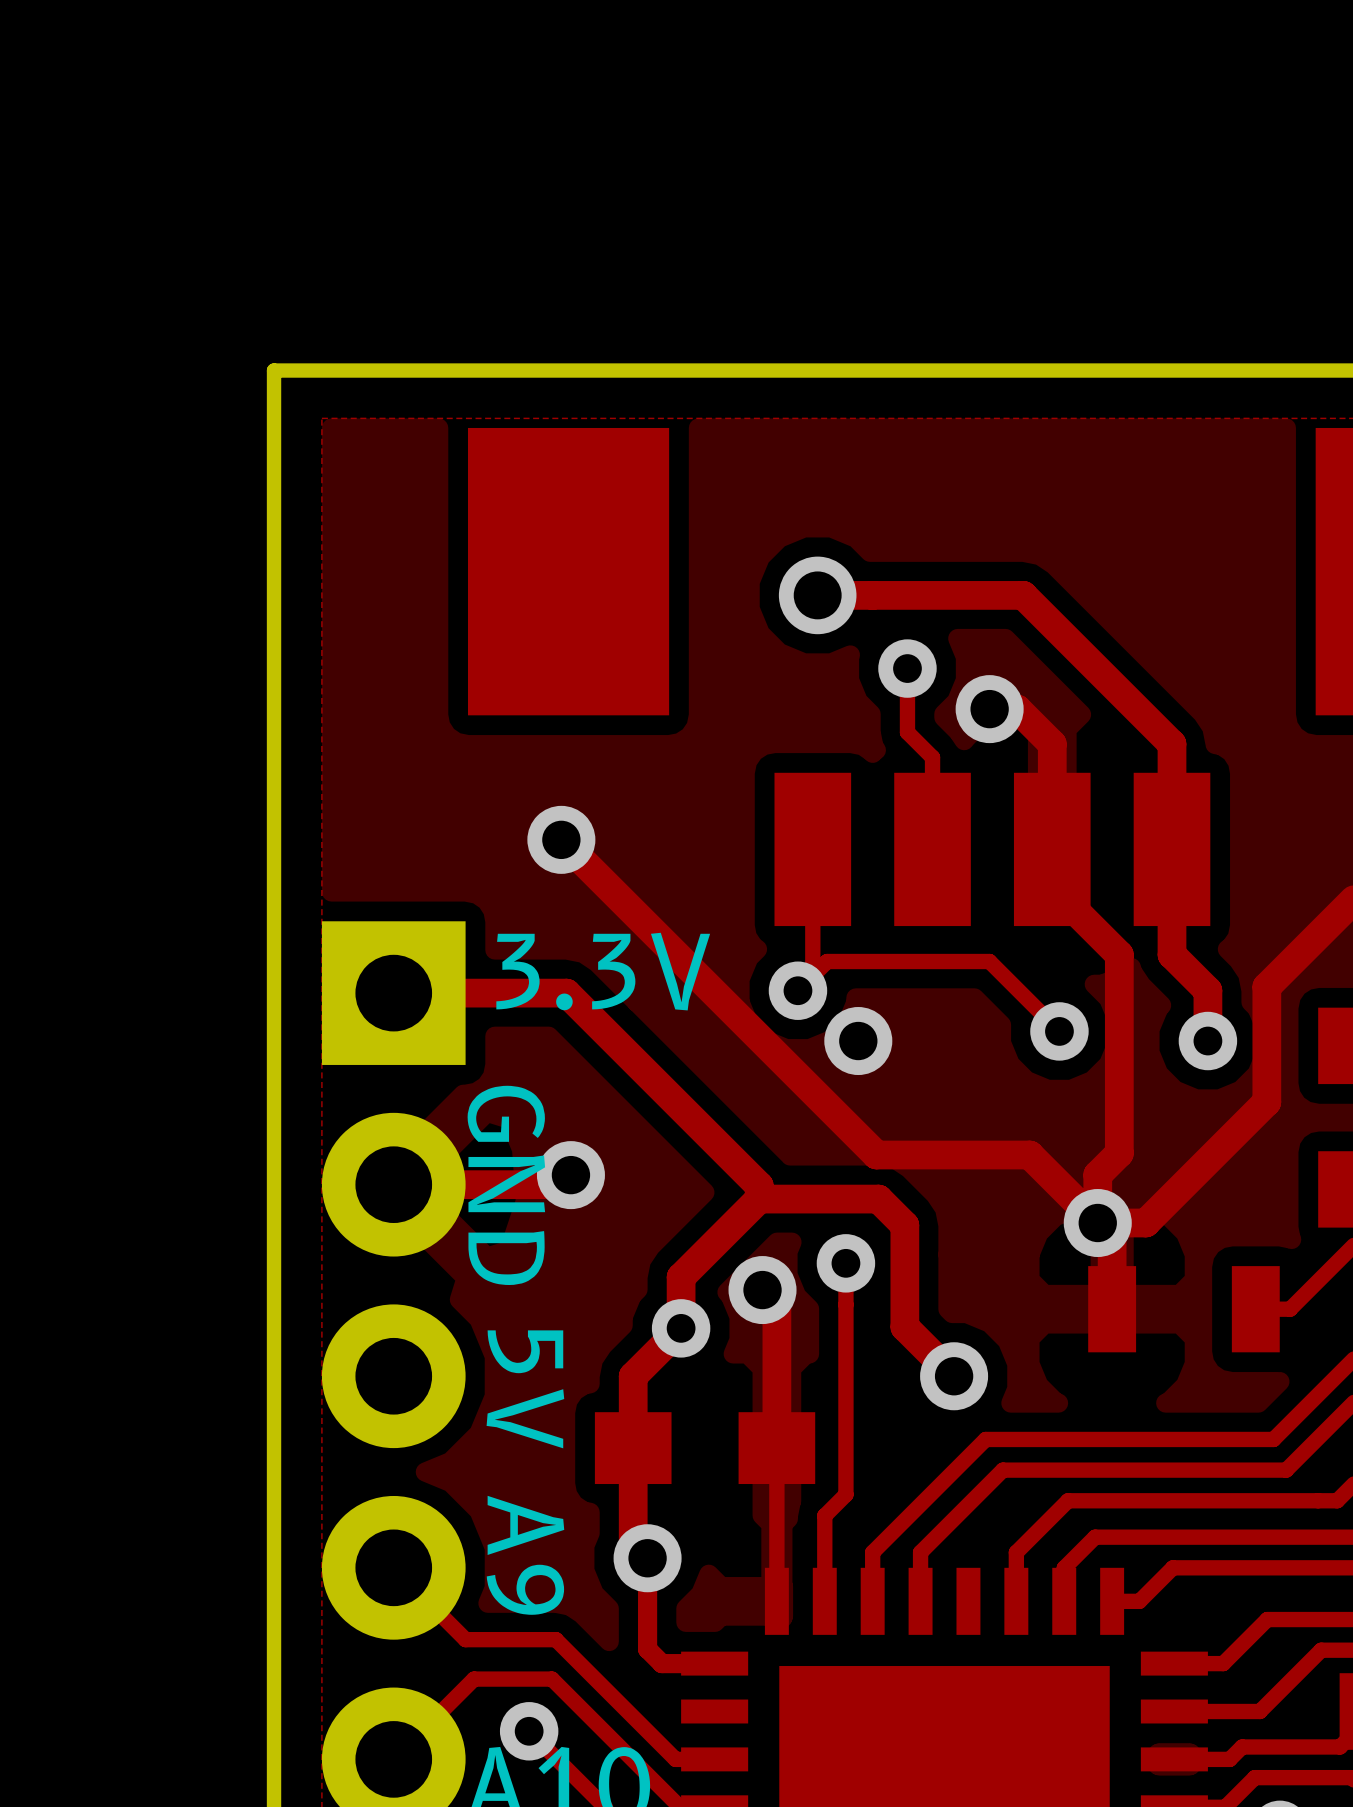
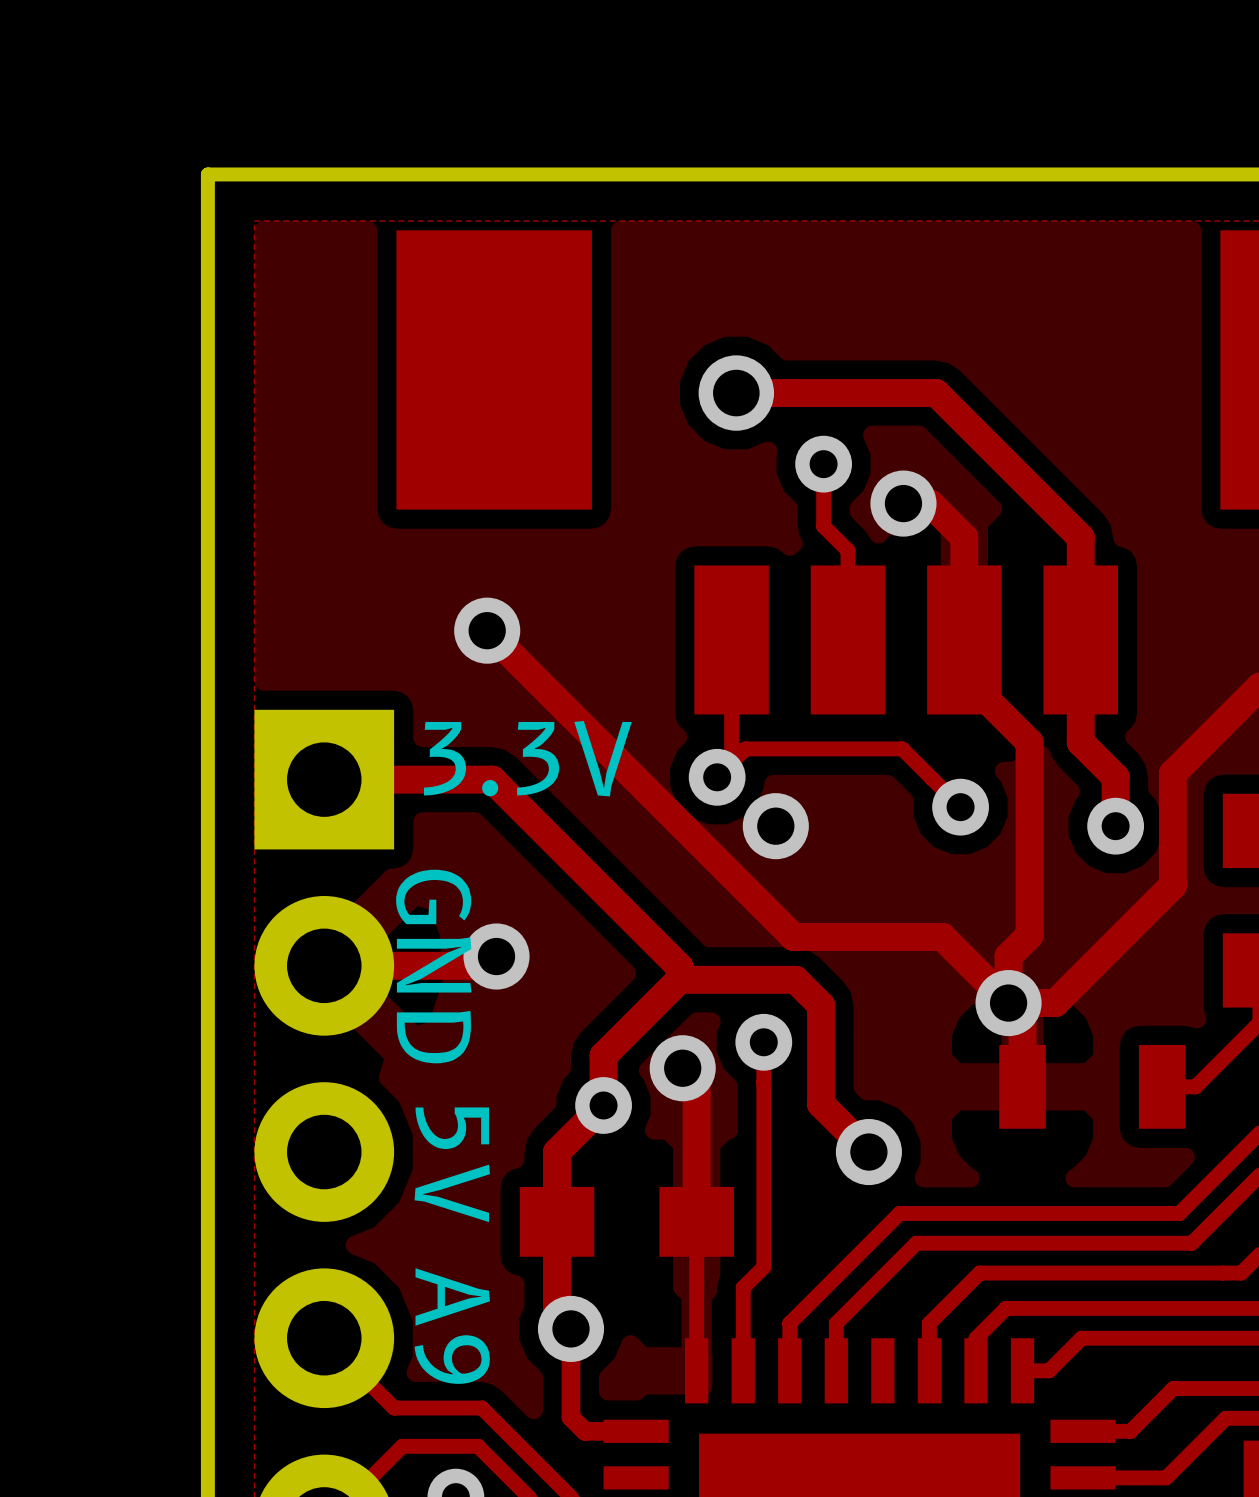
track: (989, 961) (1059, 1031) -> (902, 748) (960, 807)
via position: (1059, 1031) -> (960, 807)

